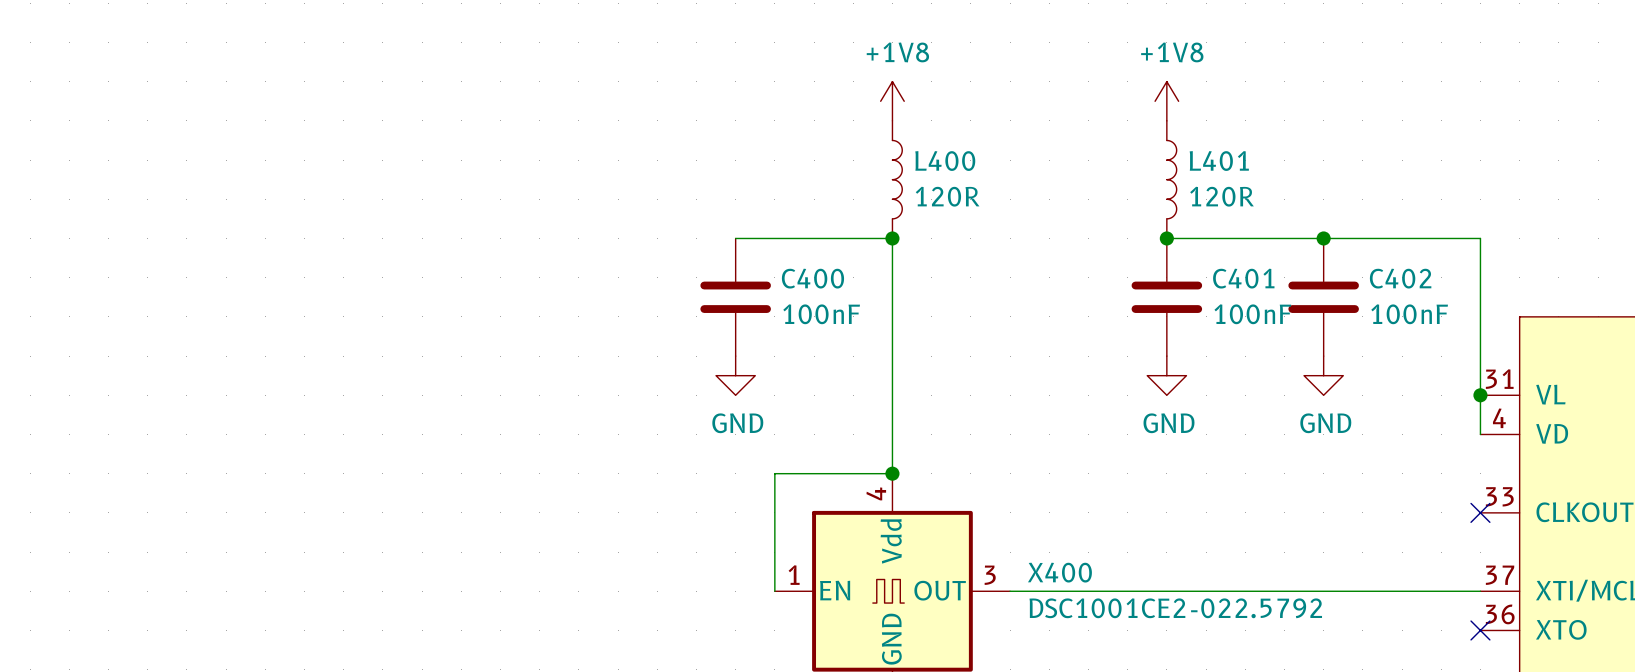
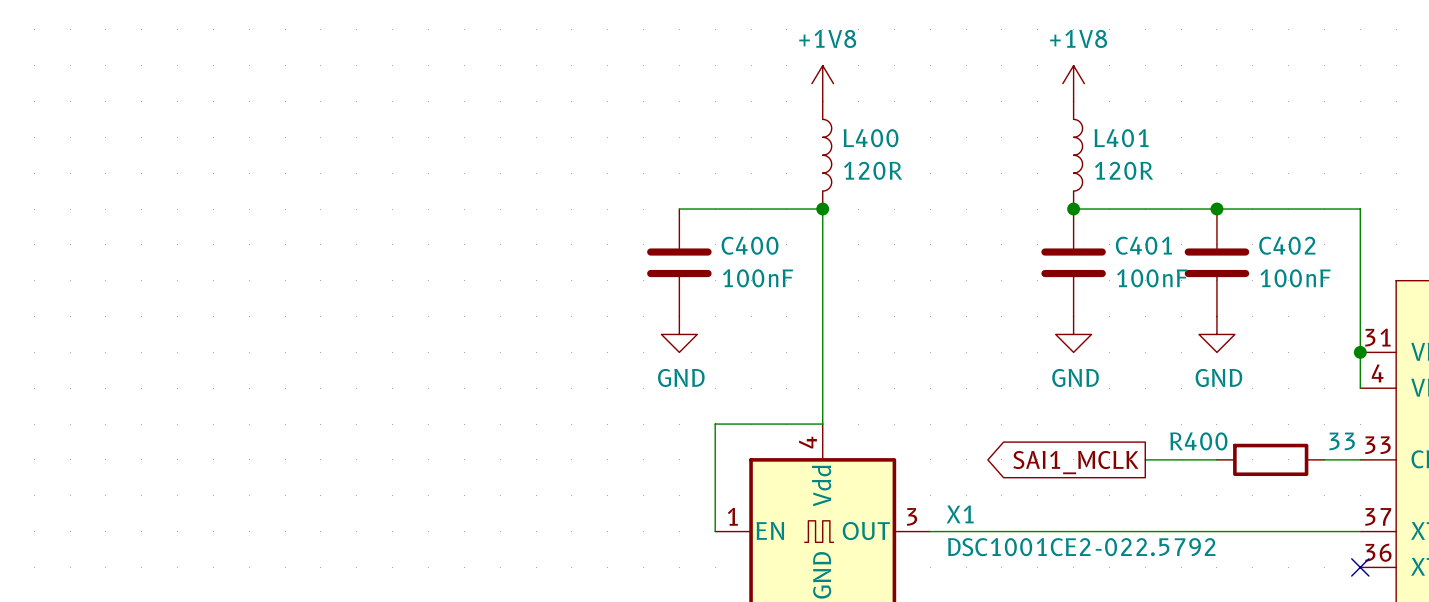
junction: (892, 473) -> none
wire: none -> (1145, 459) (1216, 459)
R400: none -> 33 (1270, 459)
wire: none -> (1324, 459) (1360, 459)
no-connect mark: (1480, 512) -> none
global label: none -> SAI1_MCLK (1075, 462)
X400 name: X400 (1059, 572) -> X1 (960, 514)

